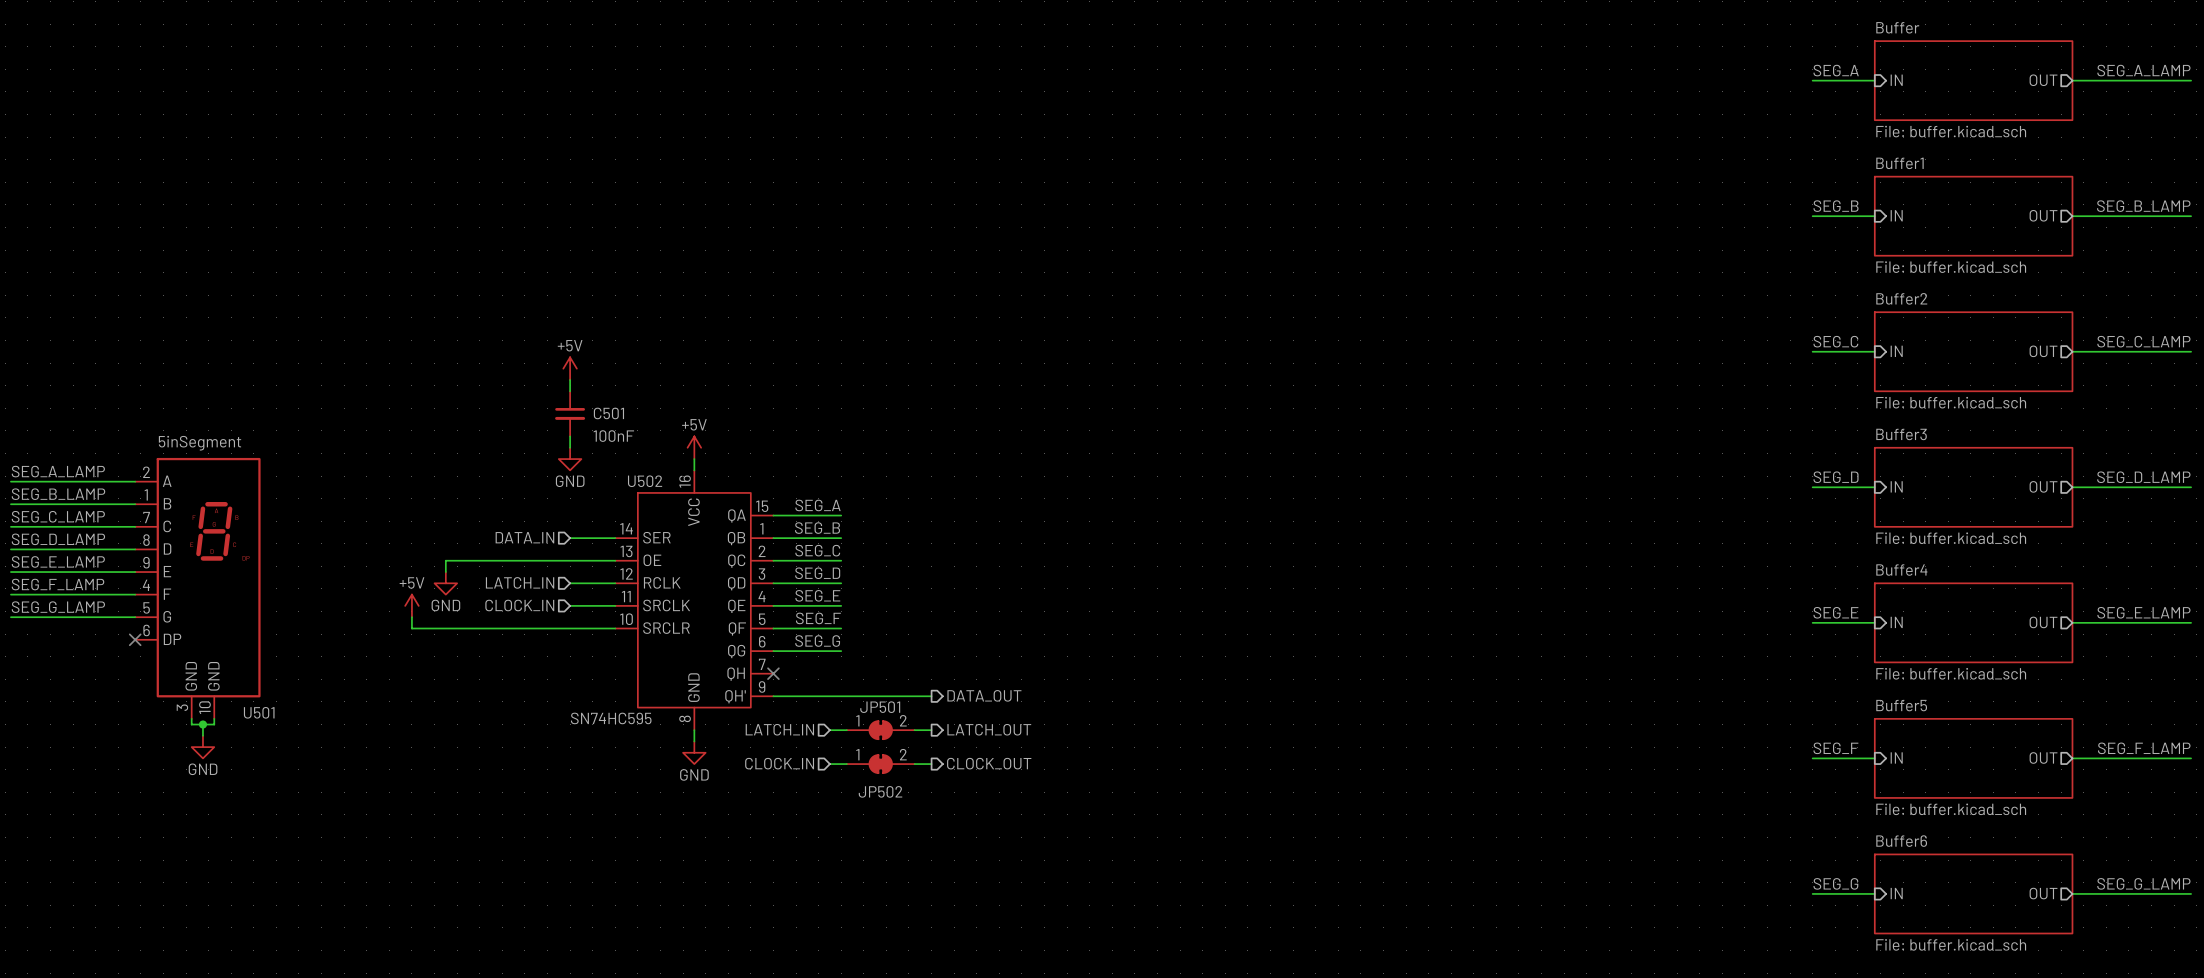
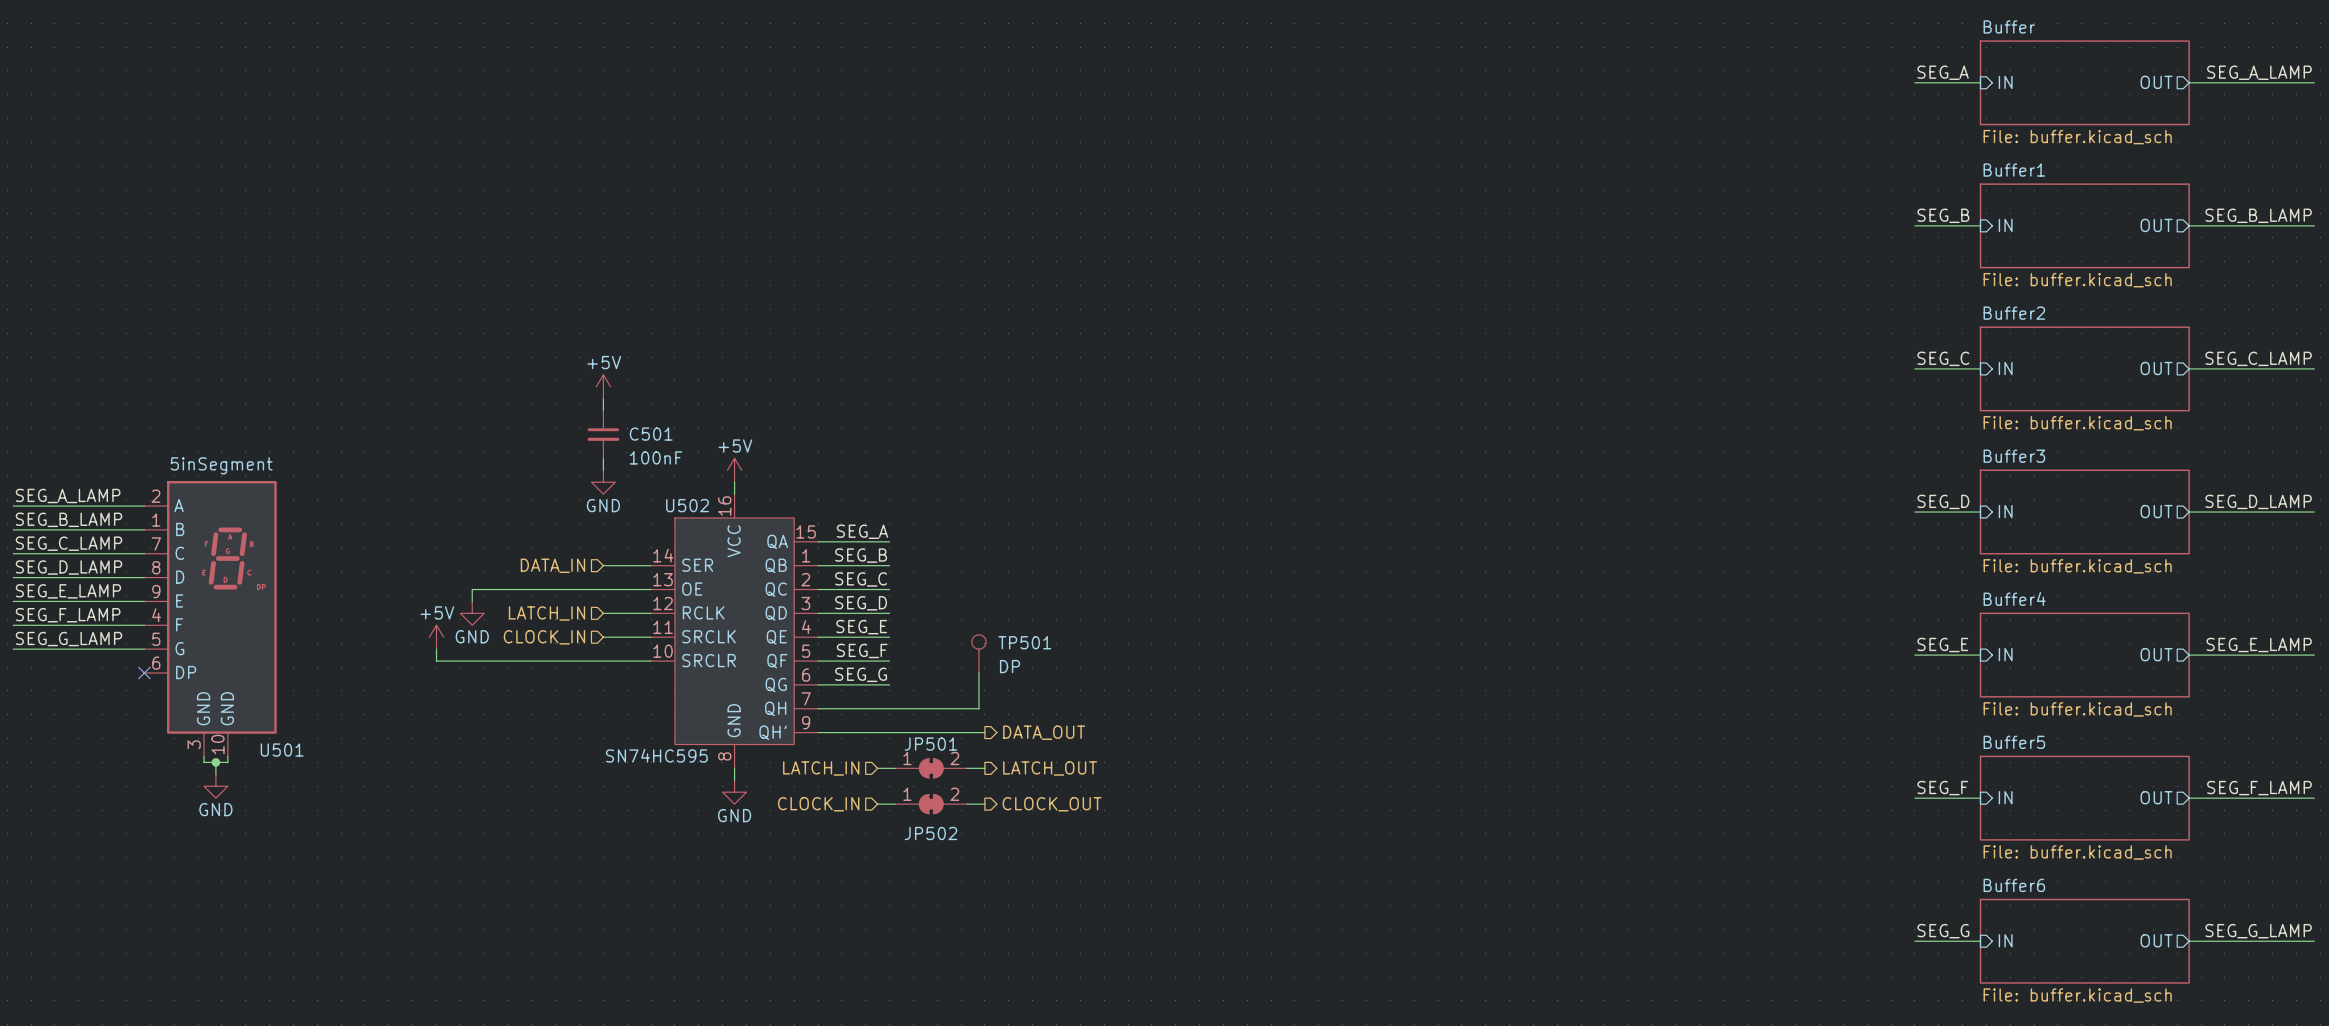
TP501: none -> DP (978, 653)
wire: none -> (978, 672) (978, 708) (818, 708)
no-connect mark: (773, 673) -> none

